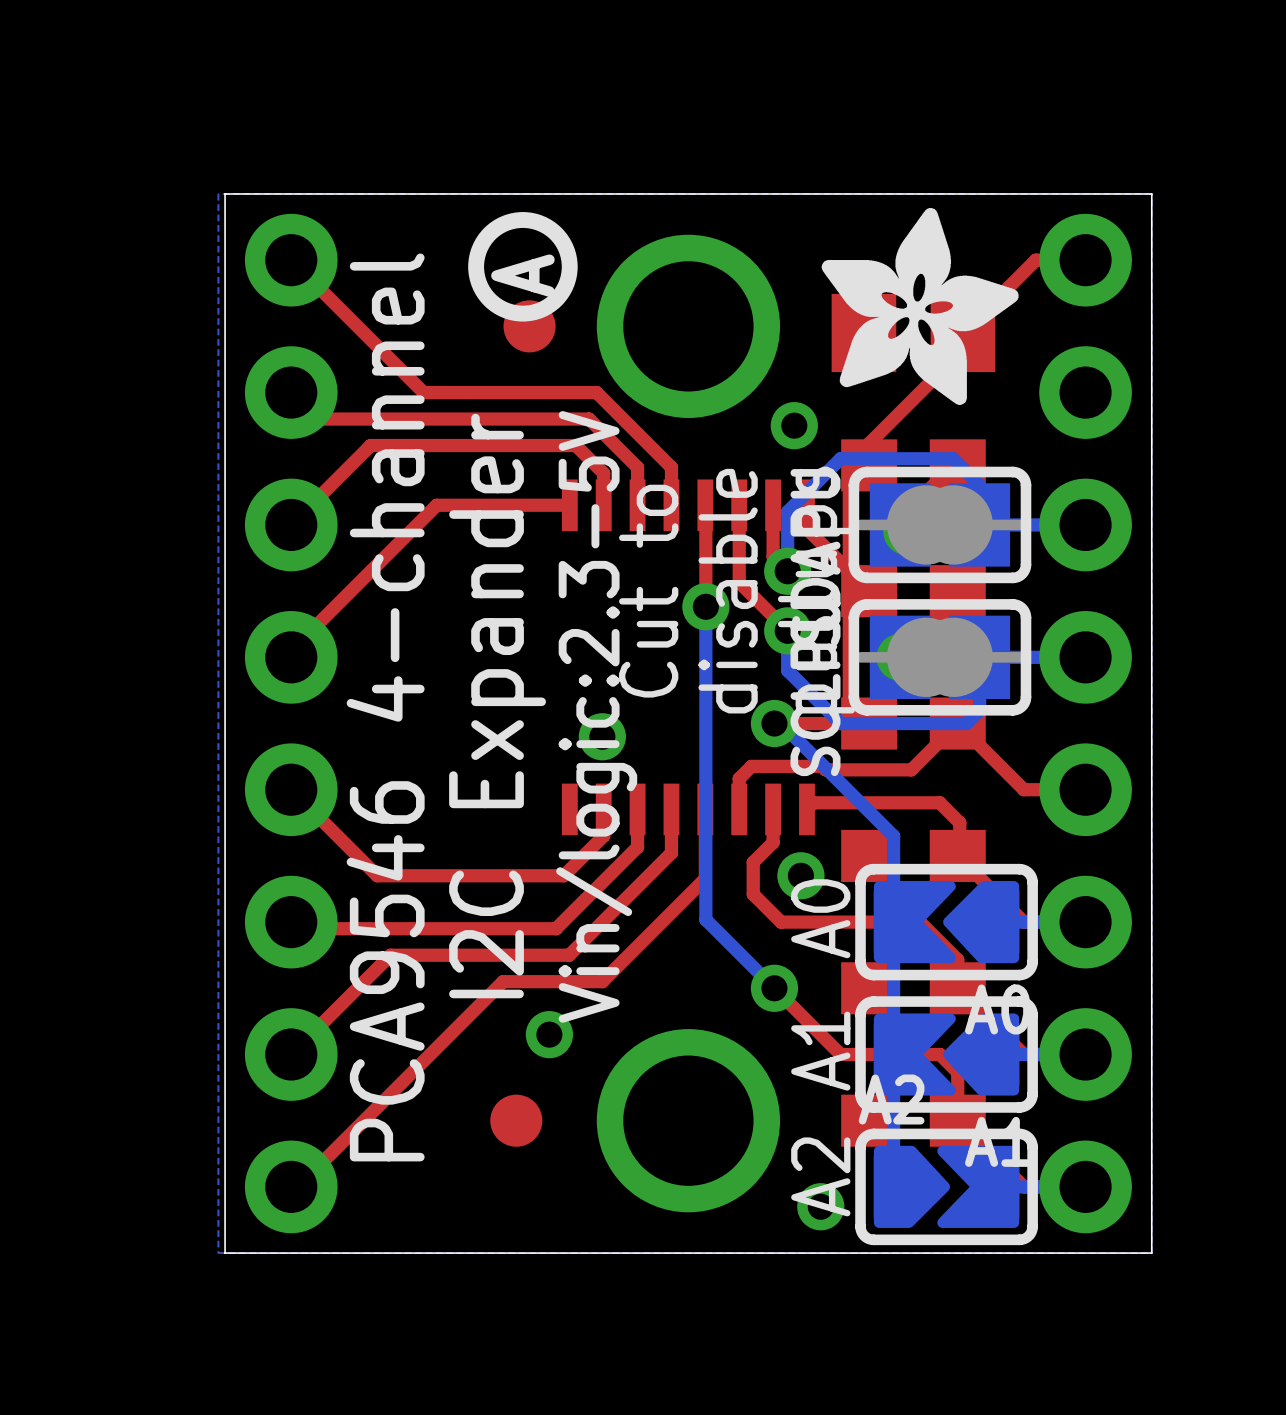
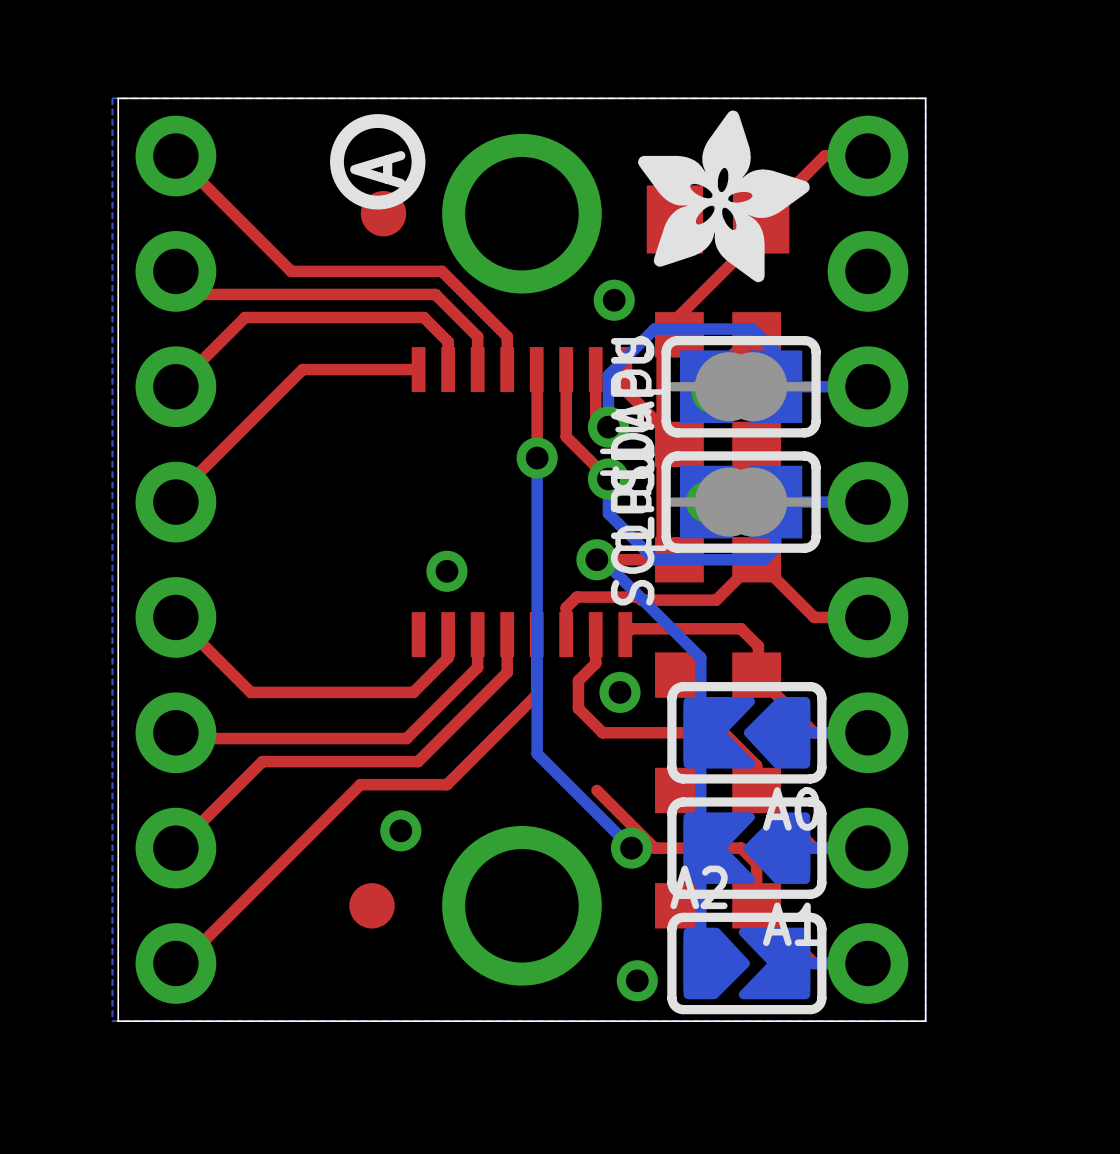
text: Cut to (648, 591) -> none
text: disable (728, 591) -> none
text: I2C Expander (497, 706) -> none
text: PCA9546 4-channel (385, 707) -> none
text: Vin/logic:2.3-5V (596, 716) -> none
text: A0 (820, 918) -> none
bottom track: (705, 919) (774, 988) -> (537, 730) (537, 753) (631, 848)
via position: (774, 988) -> (631, 848)
text: A1 (820, 1051) -> none
text: A2 (820, 1176) -> none

